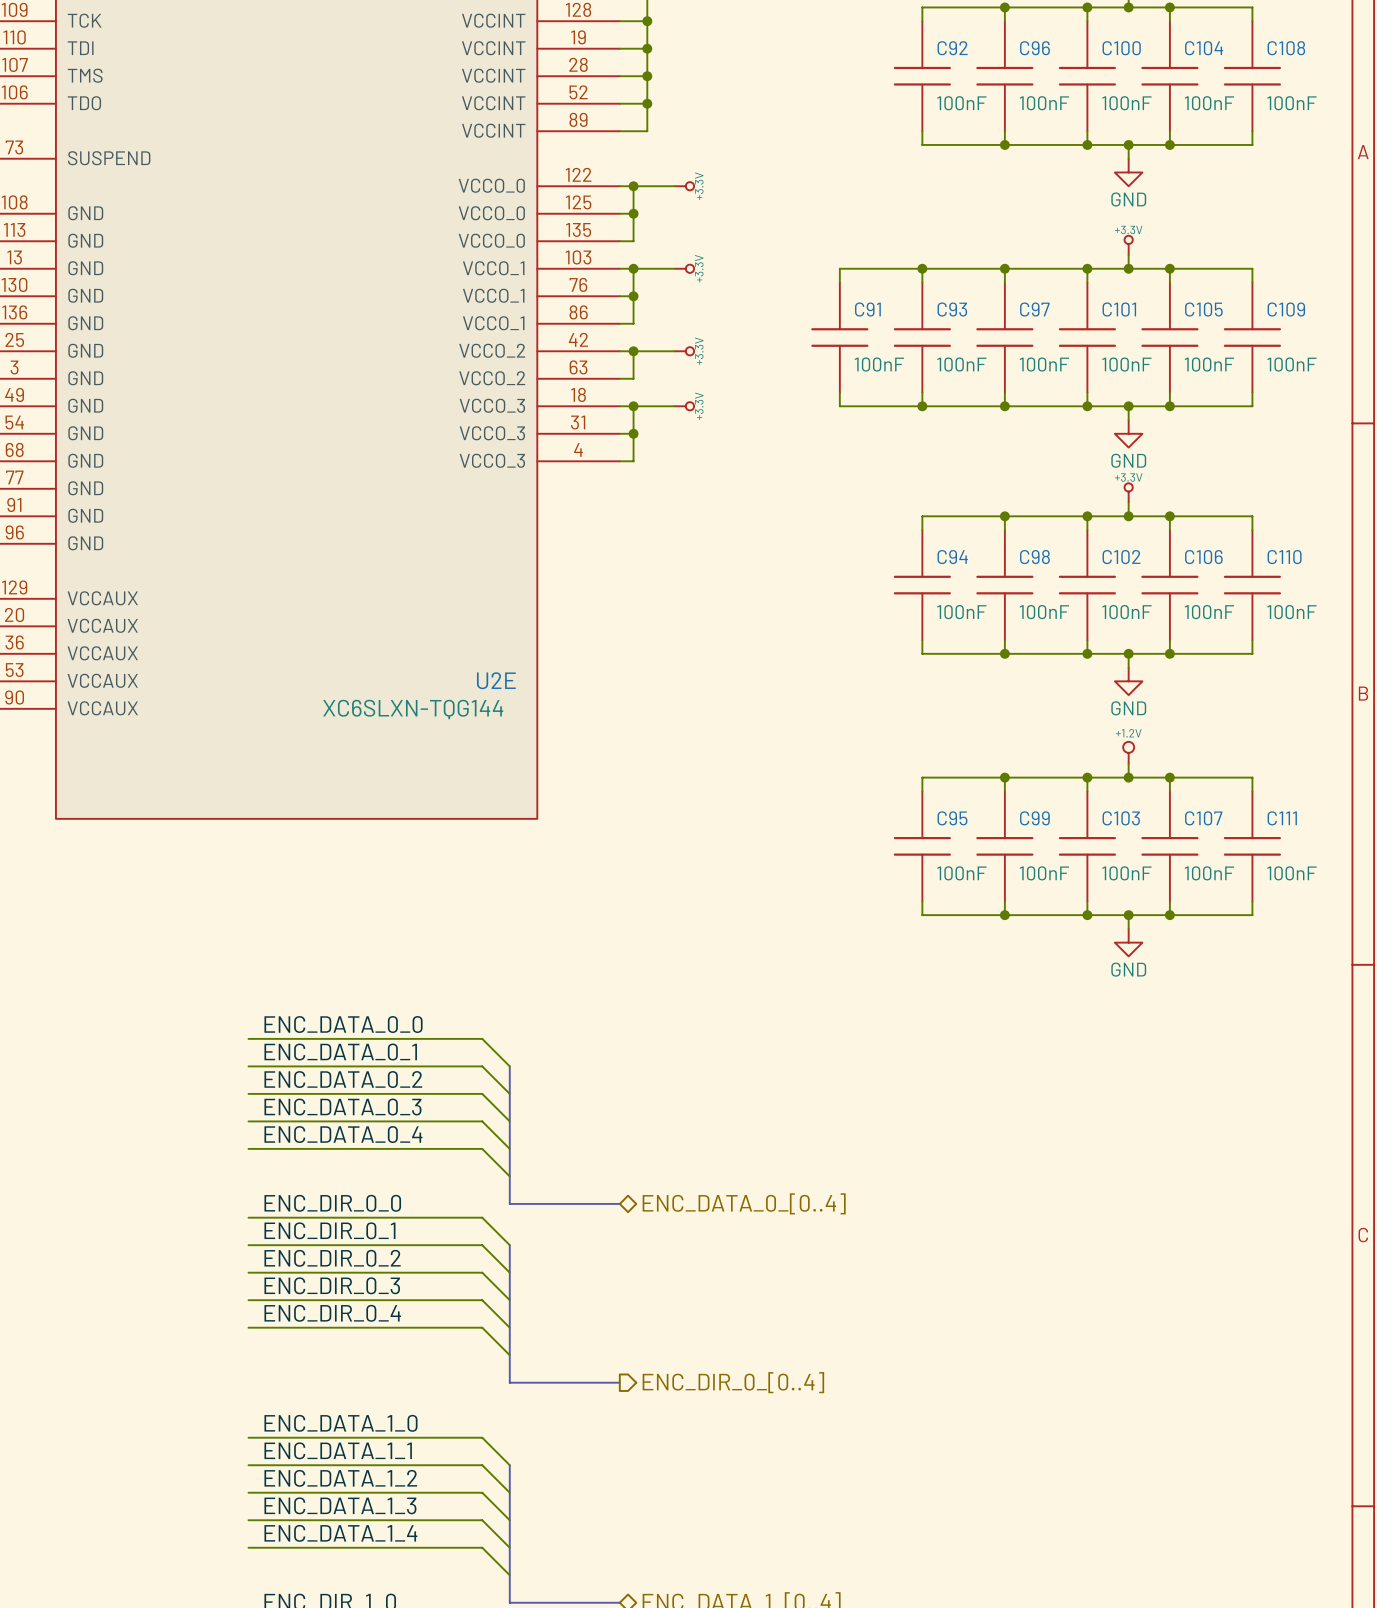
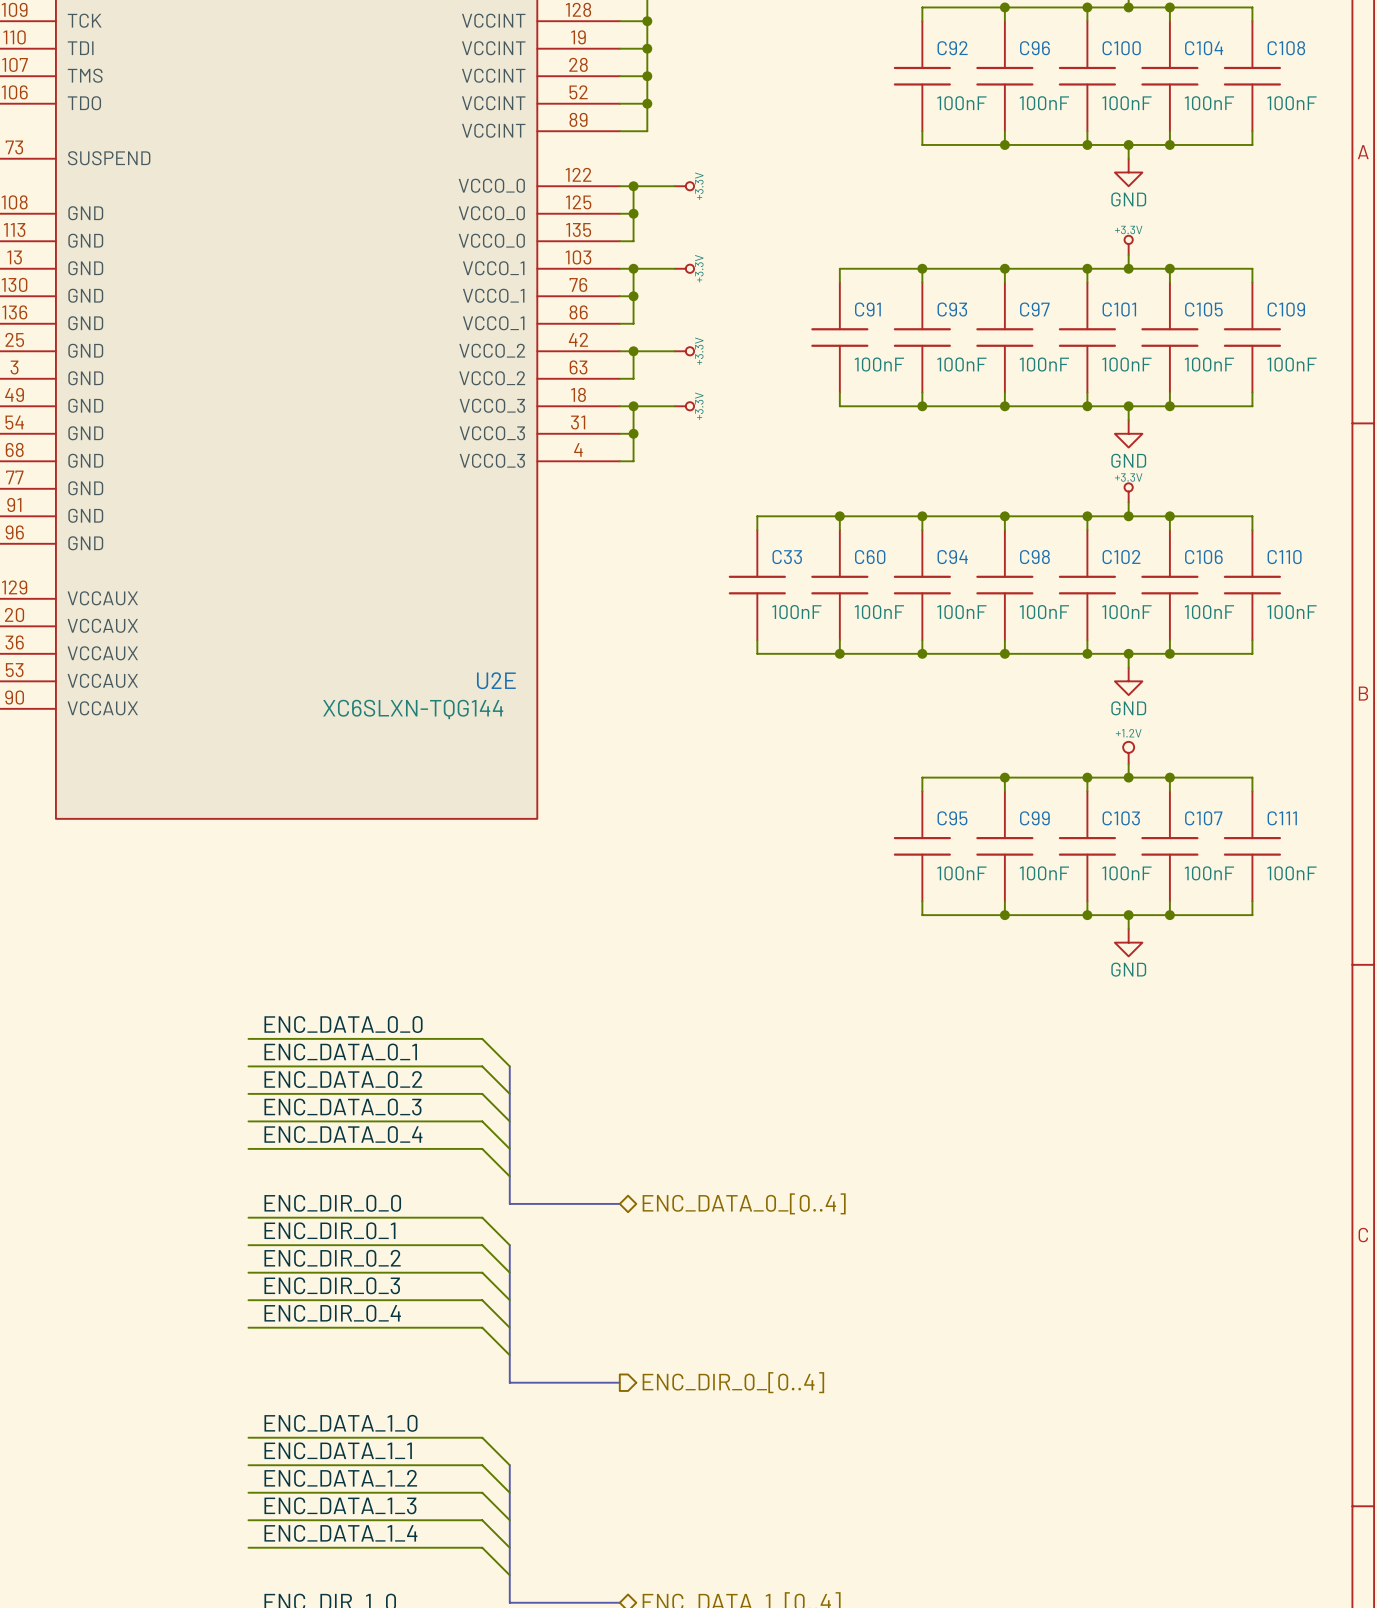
wire: none -> (839, 516) (839, 530)
junction: none -> (839, 516)
wire: none -> (922, 516) (757, 516) (757, 530)
junction: none -> (922, 516)
C33: none -> 100nF (757, 585)
C60: none -> 100nF (839, 585)
wire: none -> (757, 640) (757, 653) (922, 653)
wire: none -> (839, 640) (839, 653)
junction: none -> (839, 653)
junction: none -> (922, 653)

